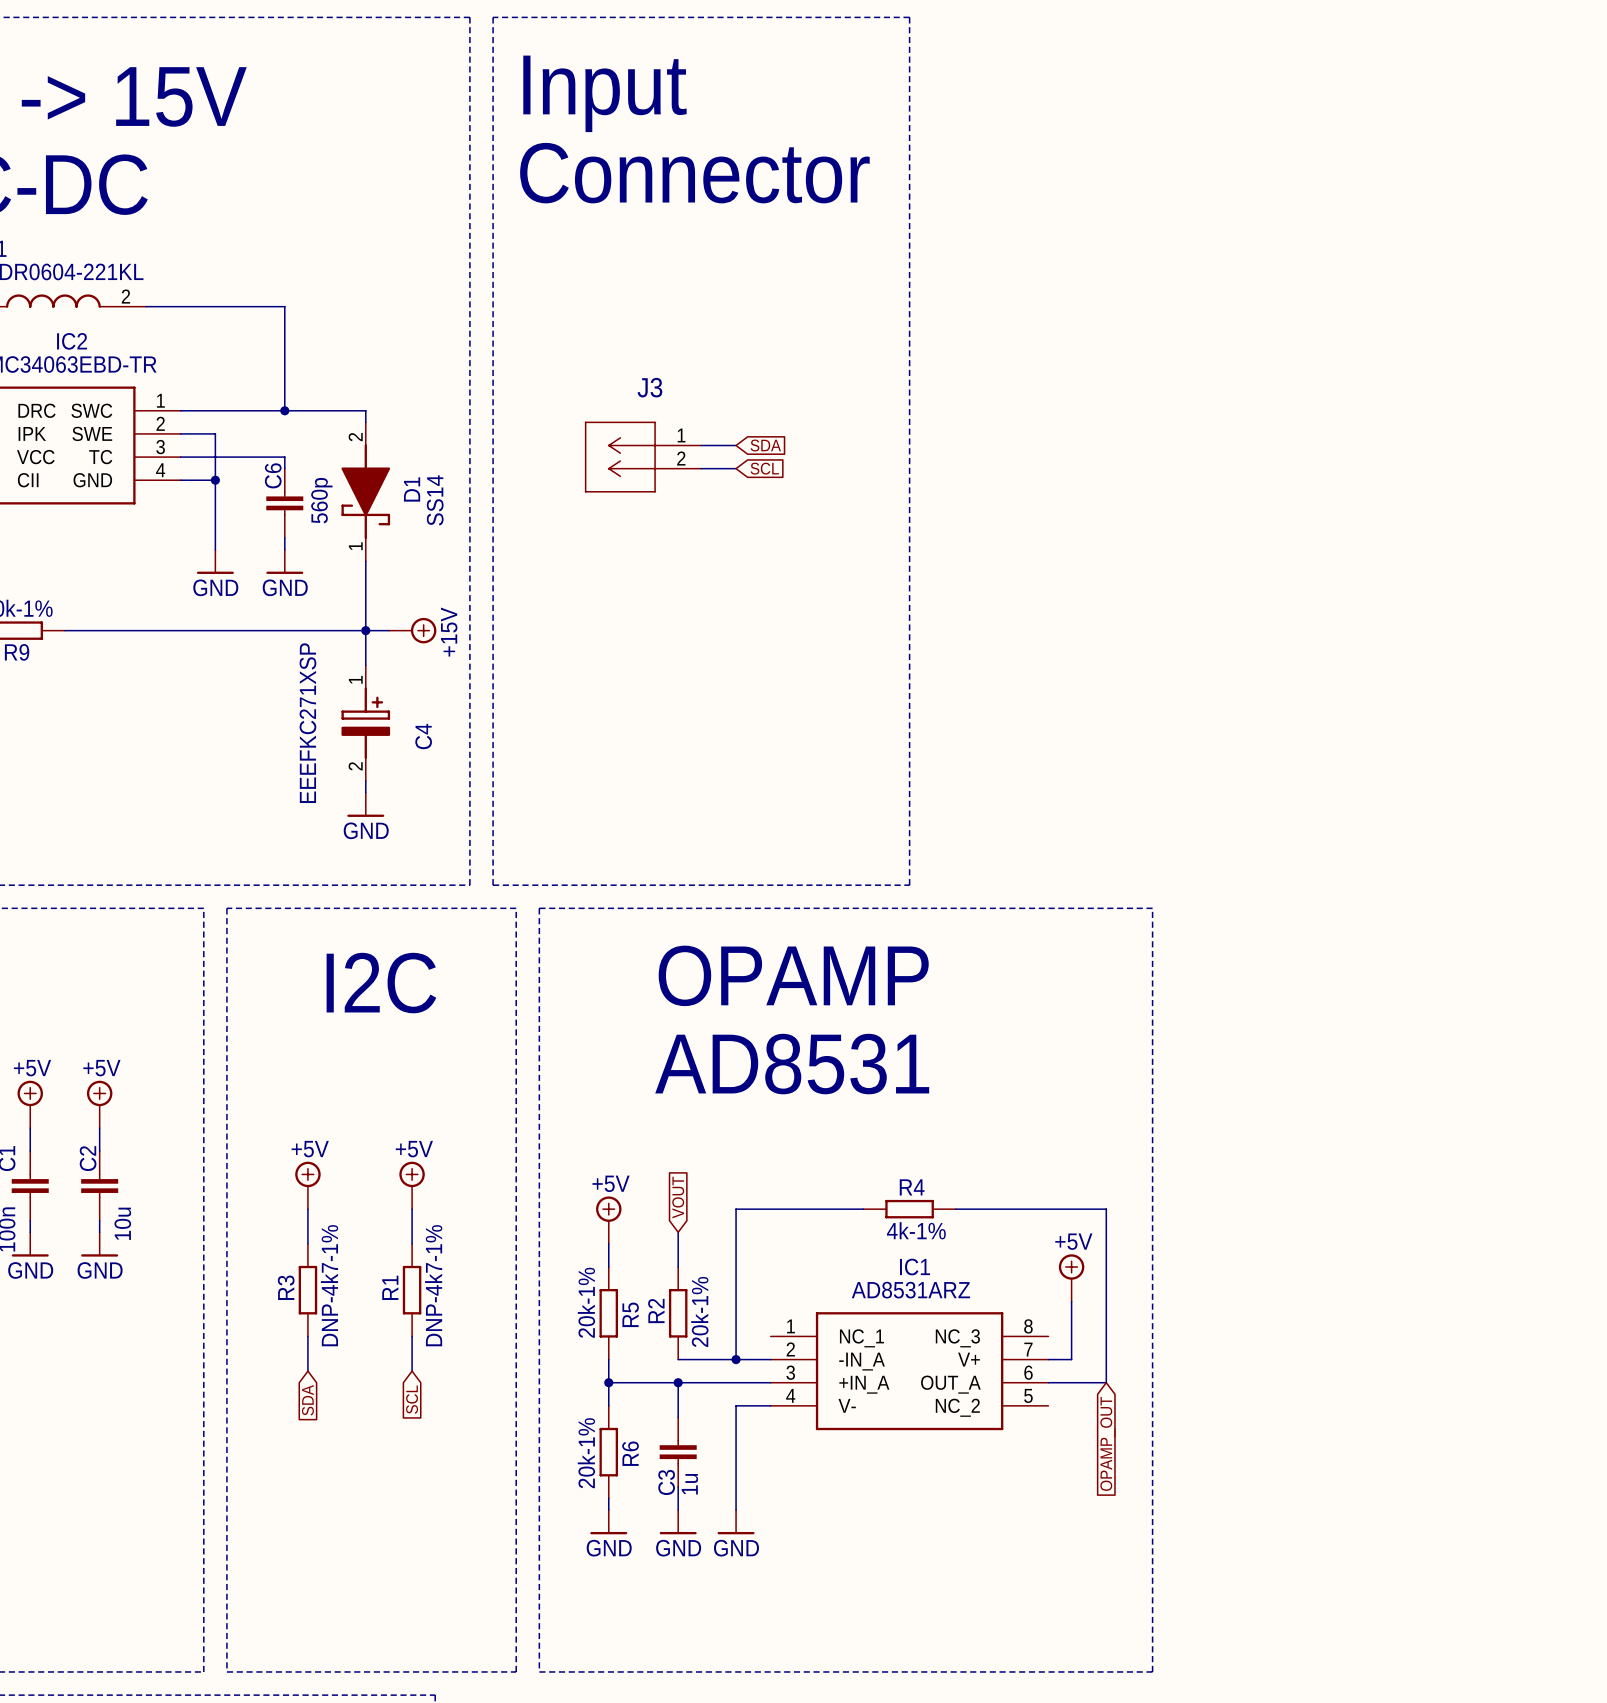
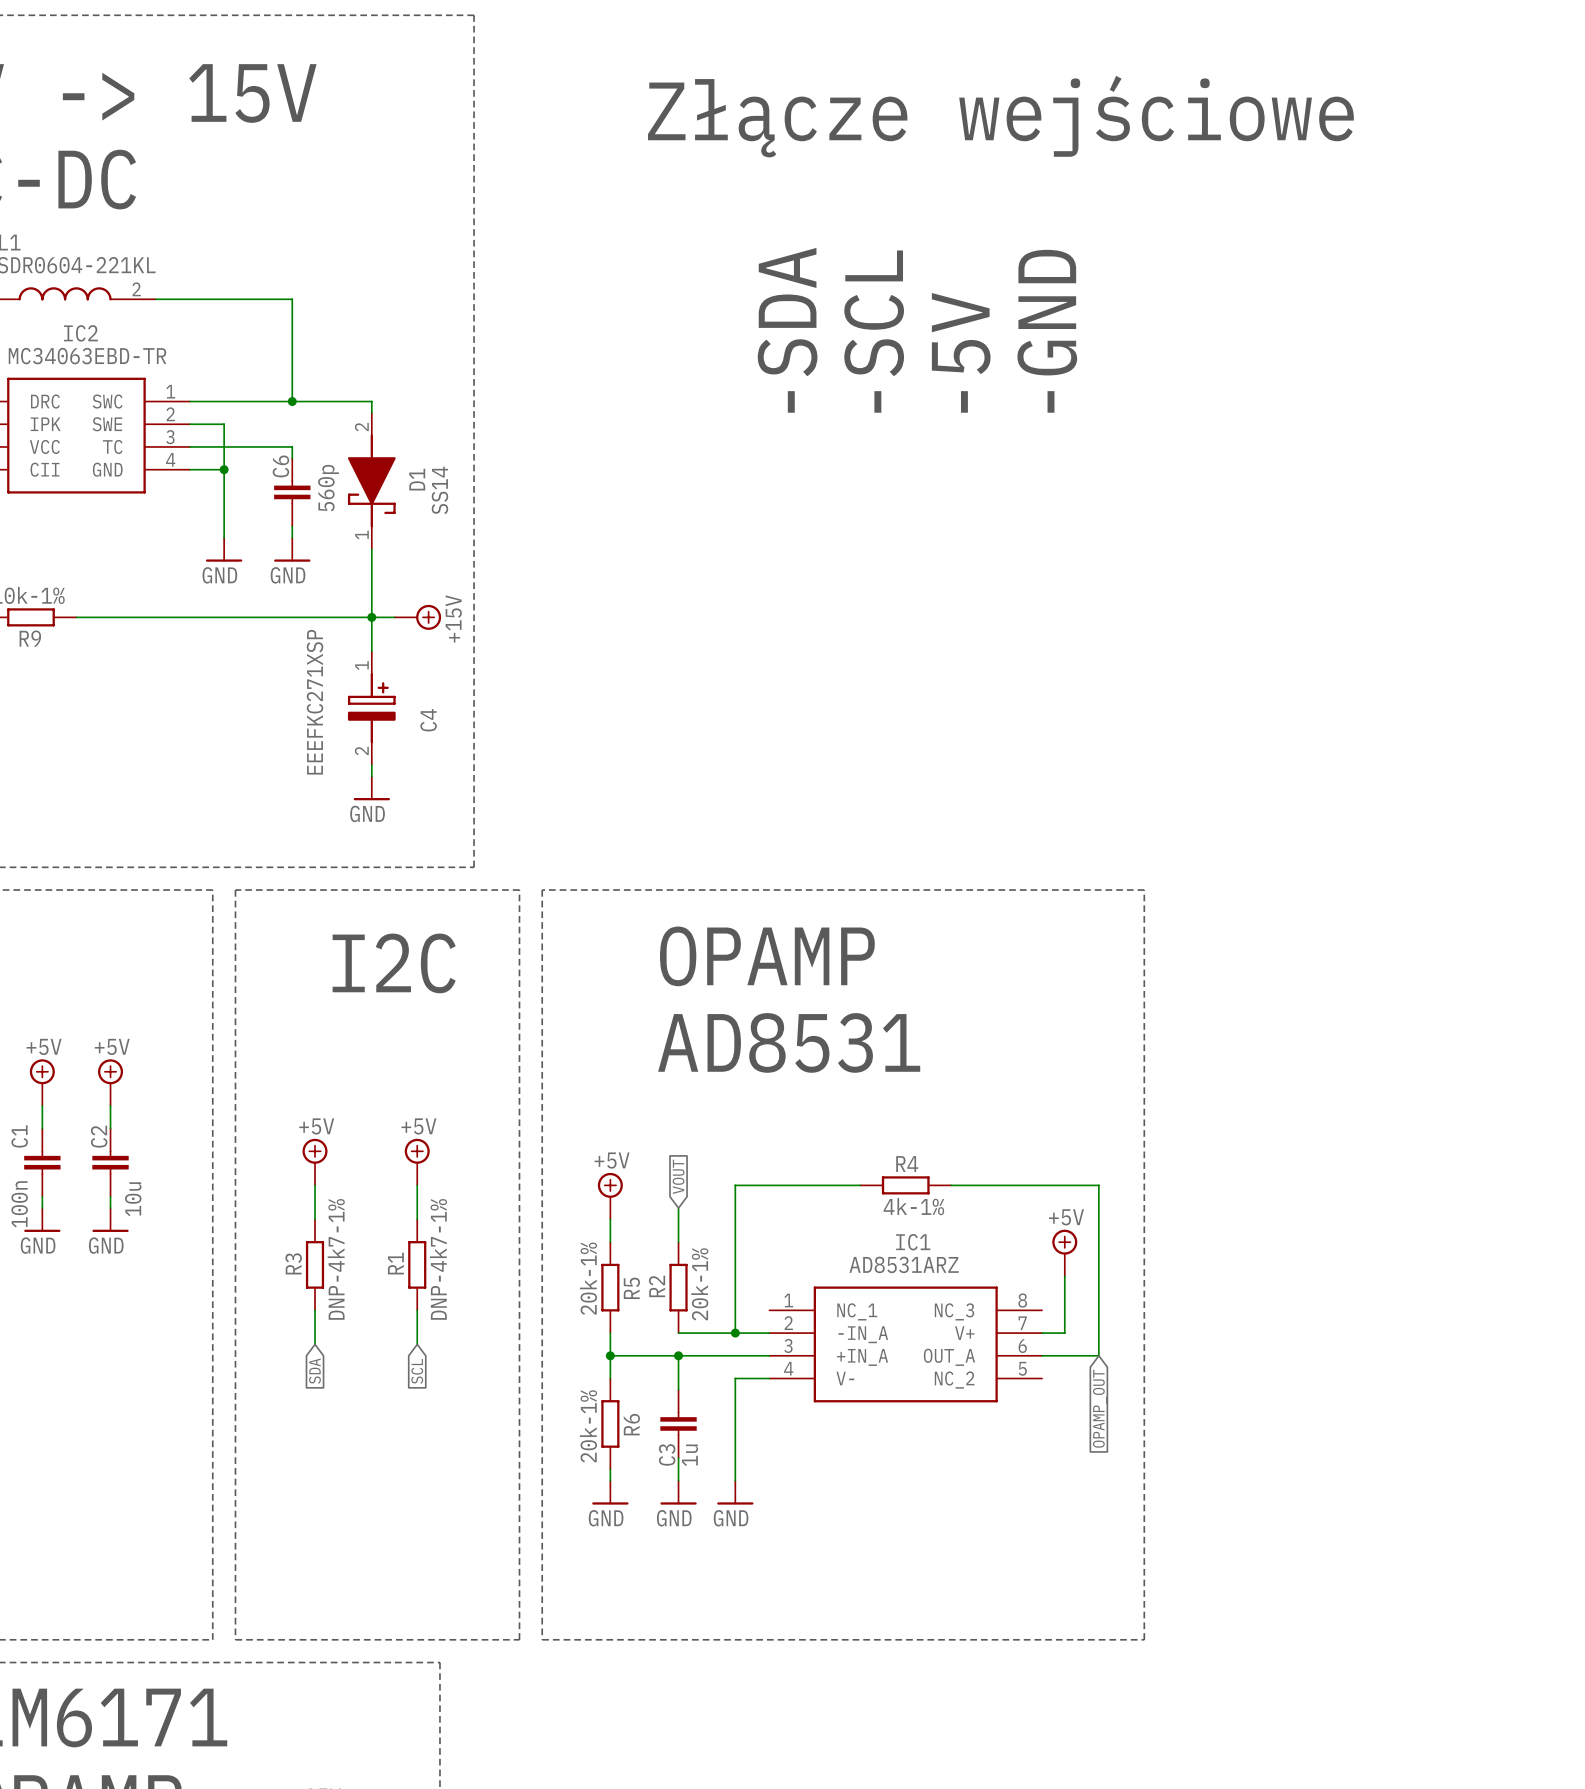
line: (493, 17) (493, 885) (909, 885) (909, 17) (493, 17) -> none
text: Input (604, 93) -> none
text: none -> Złącze wejściowe (1000, 116)
text: Connector (694, 173) -> none
text: none -> -GND (1047, 331)
text: none -> -SDA (787, 330)
text: none -> -SCL (874, 331)
text: none -> -5V (961, 352)
wire: (701, 445) (736, 445) -> none
global label: SDA (765, 445) -> none
J3: (643, 457) -> none
wire: (701, 468) (736, 468) -> none
global label: SCL (764, 468) -> none

